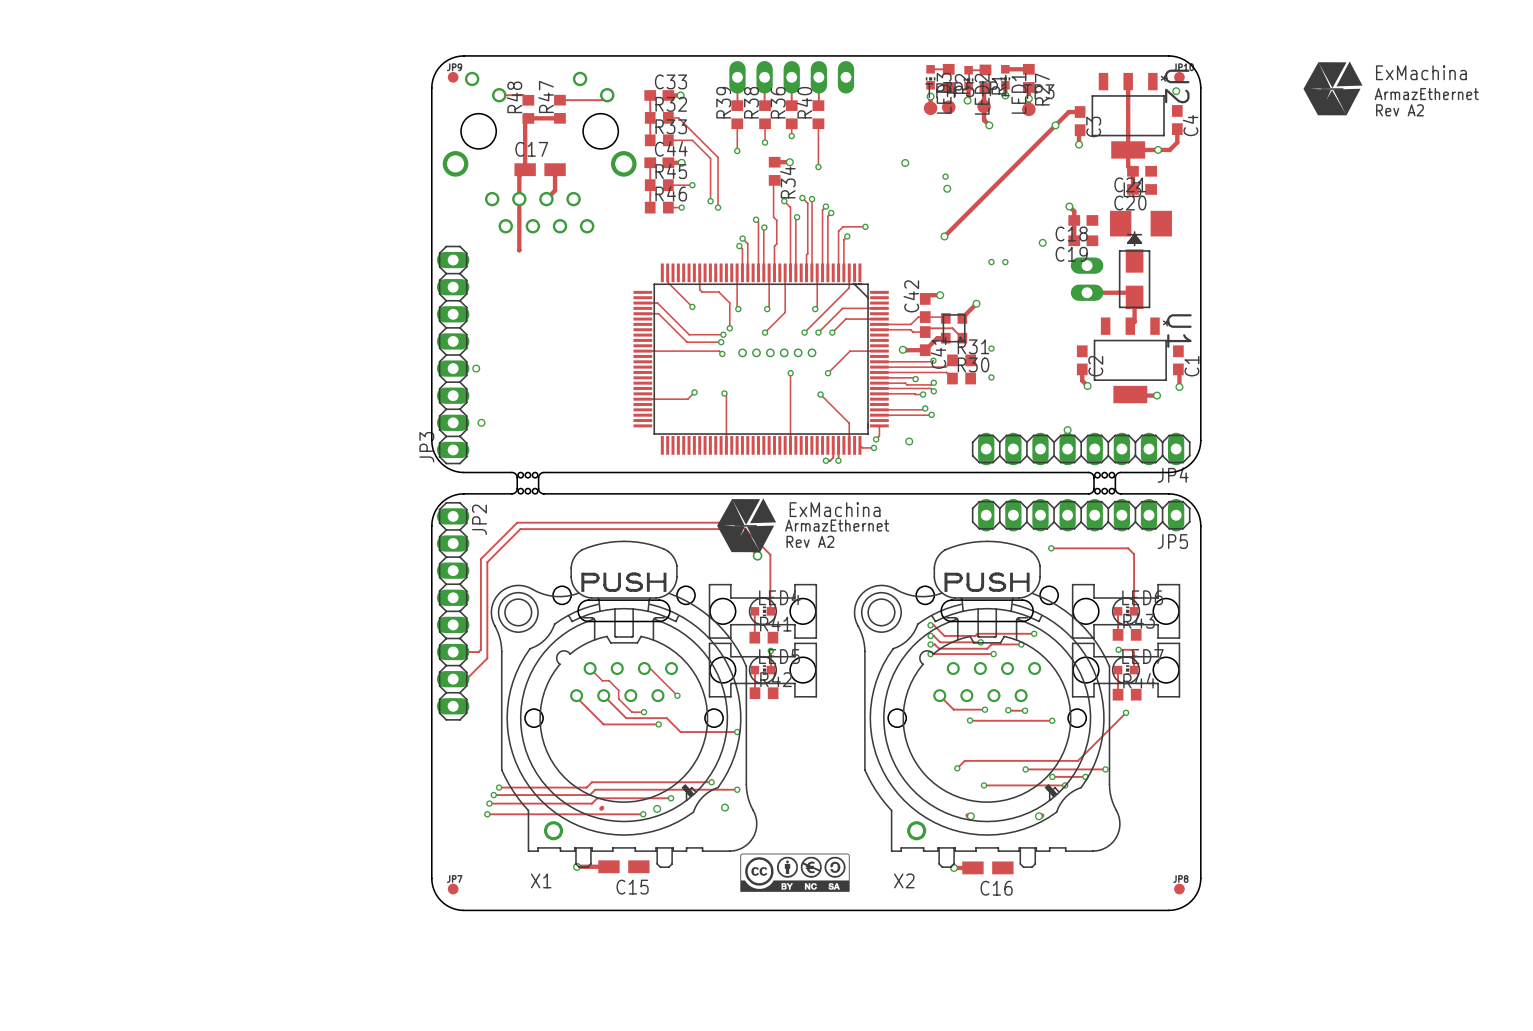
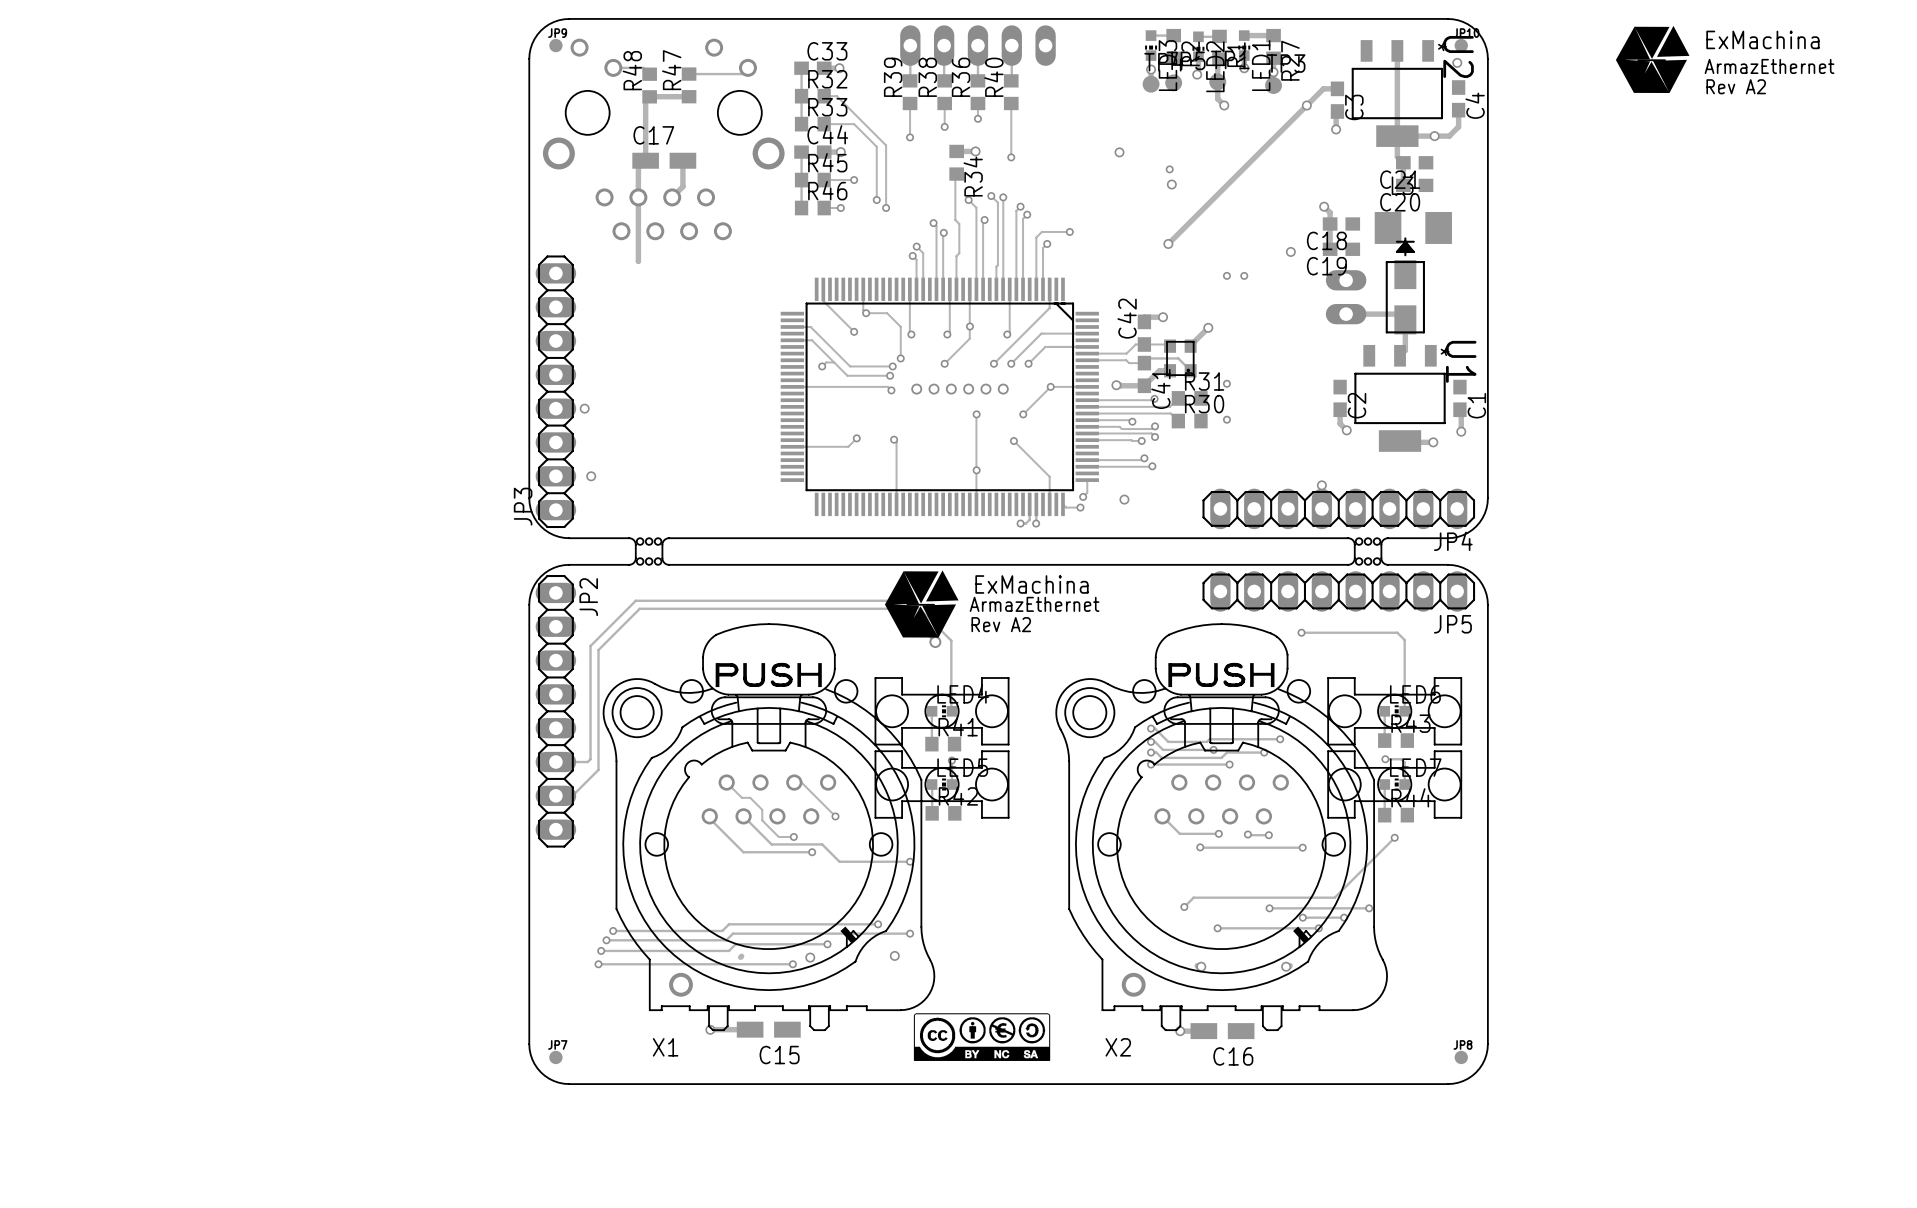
via: none -> (866, 313)
via: none -> (969, 326)
track: none -> (834, 362) (826, 362) (822, 366)
via: none -> (822, 366)
via: none -> (1050, 386)
via: none -> (976, 470)

